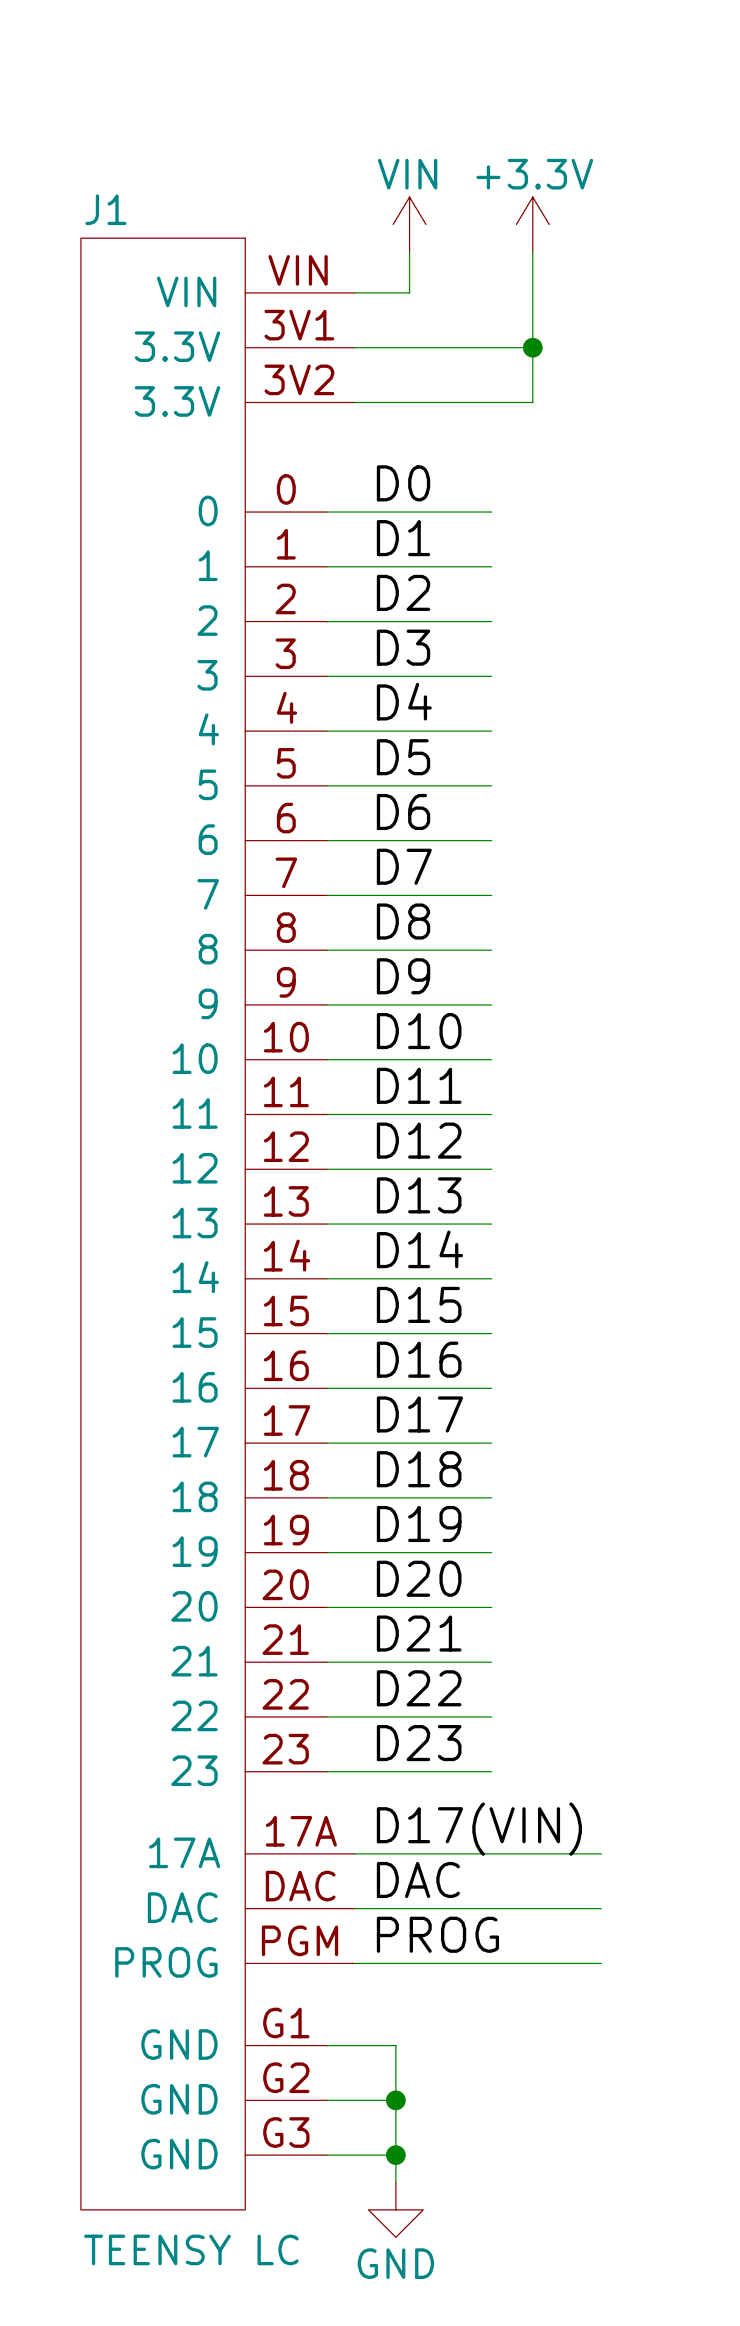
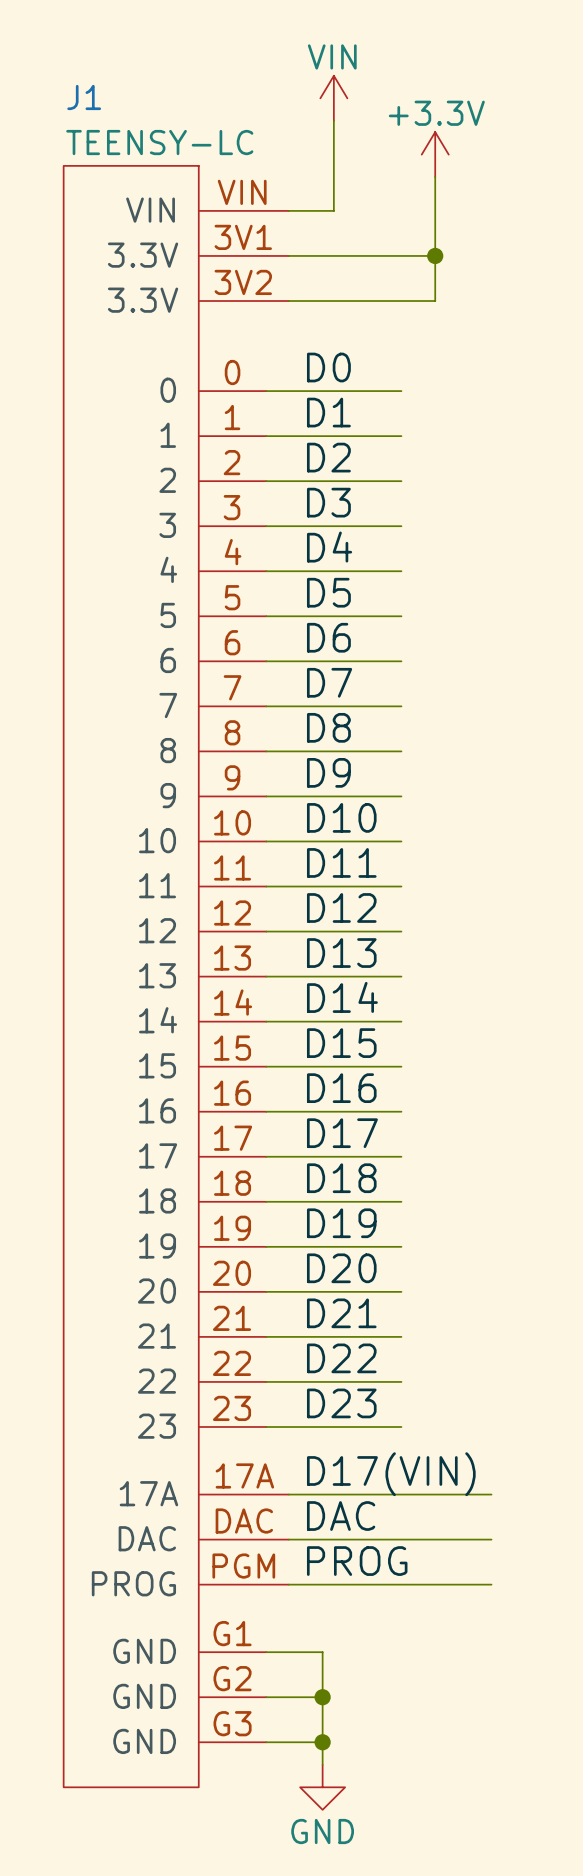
J1 name position: J1 (105, 209) -> J1 (84, 97)
power symbol position: VIN (409, 224) -> VIN (333, 98)
J1 value: TEENSY LC (191, 2249) -> TEENSY-LC (159, 142)

